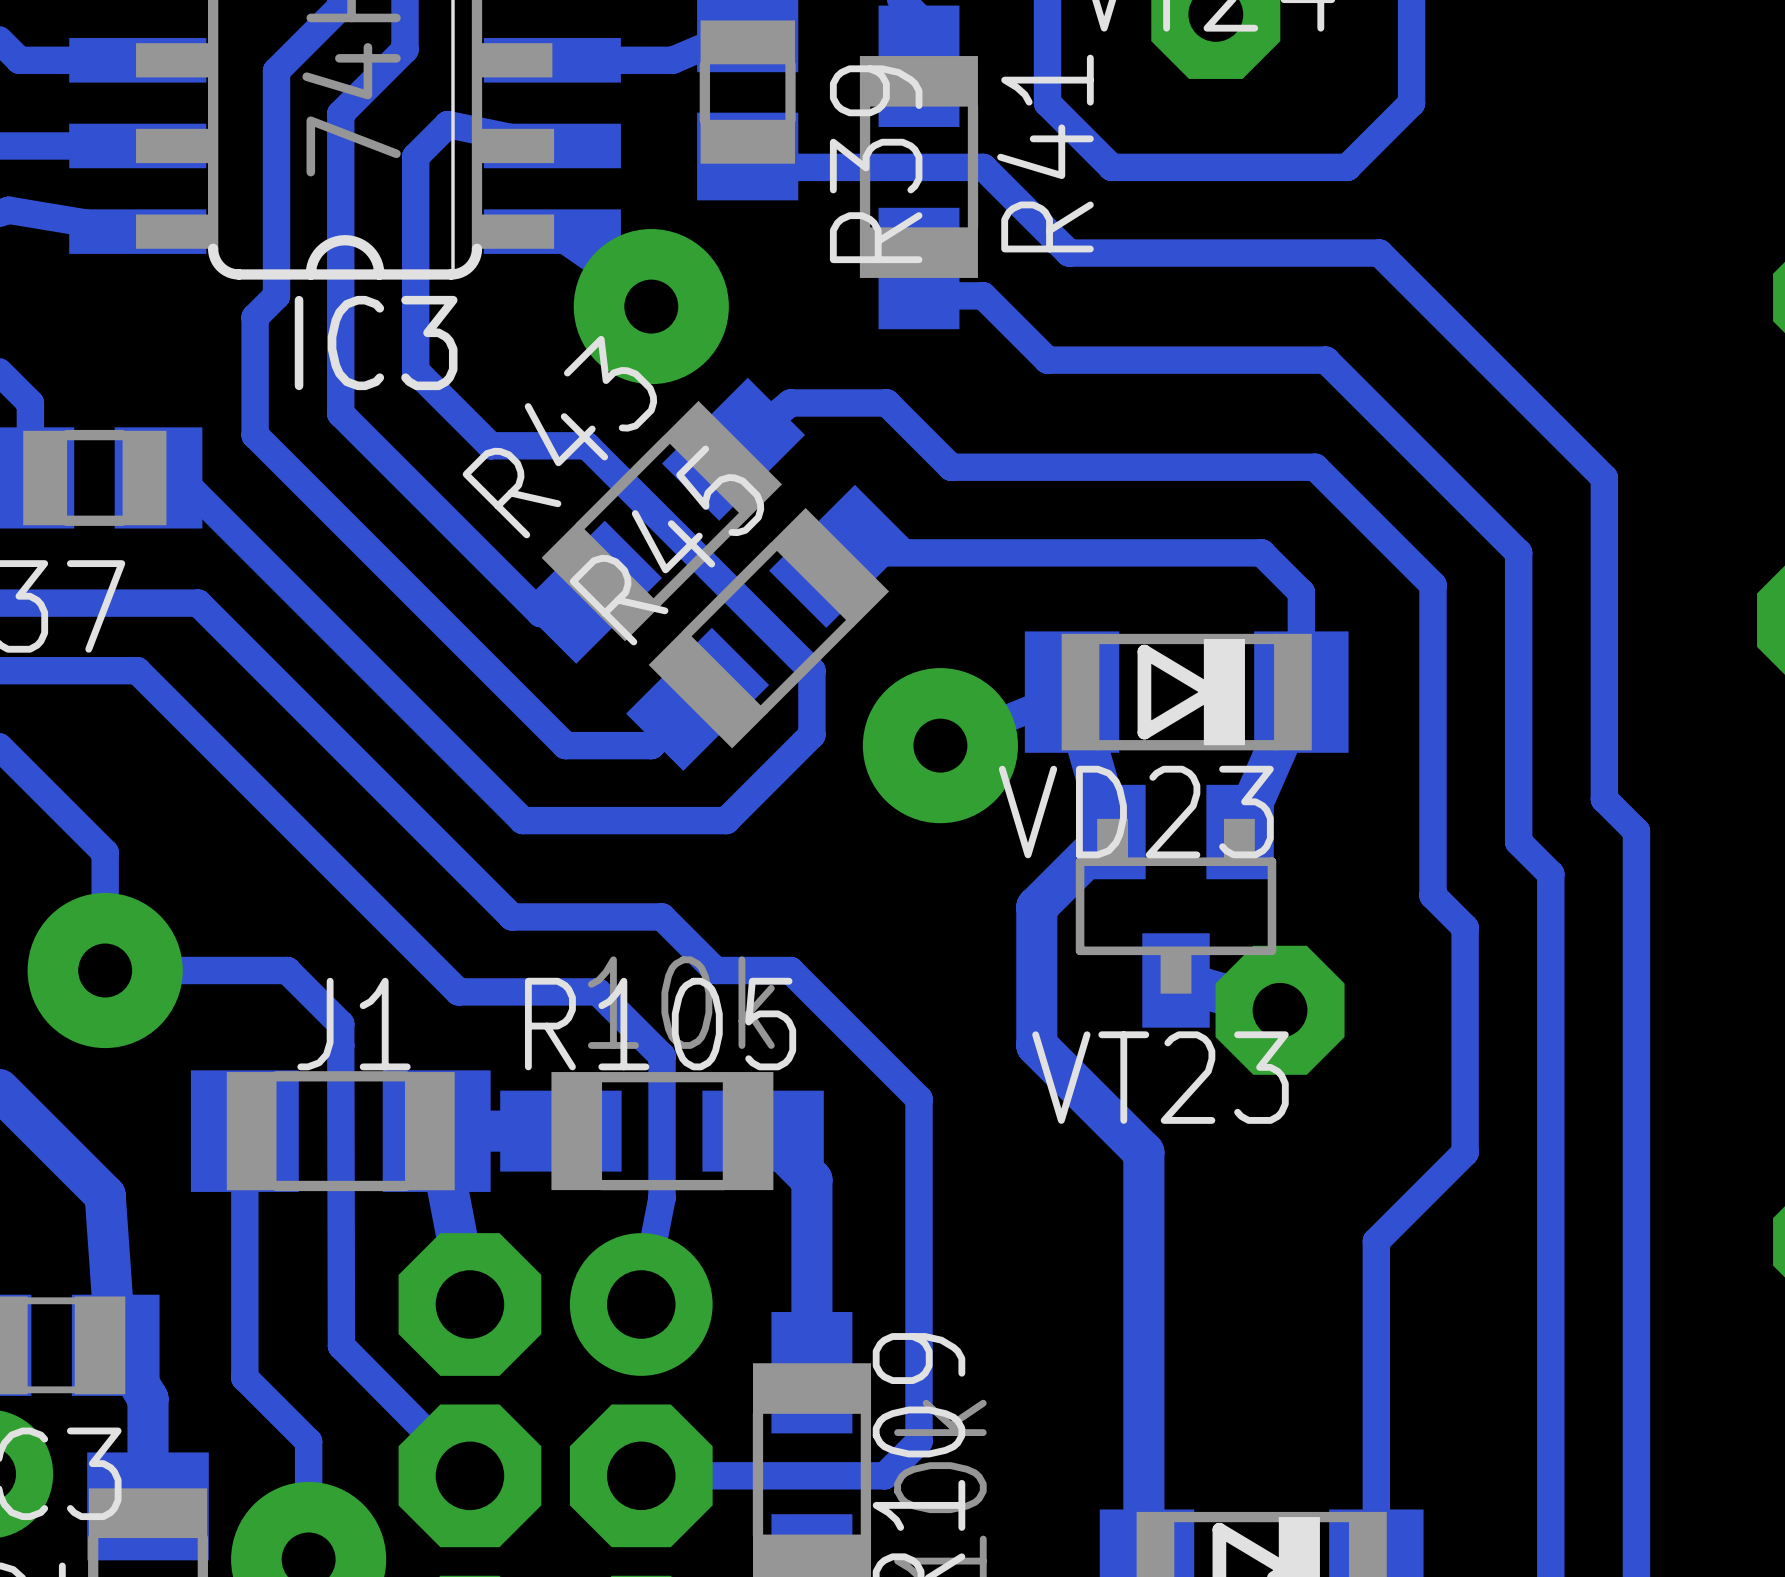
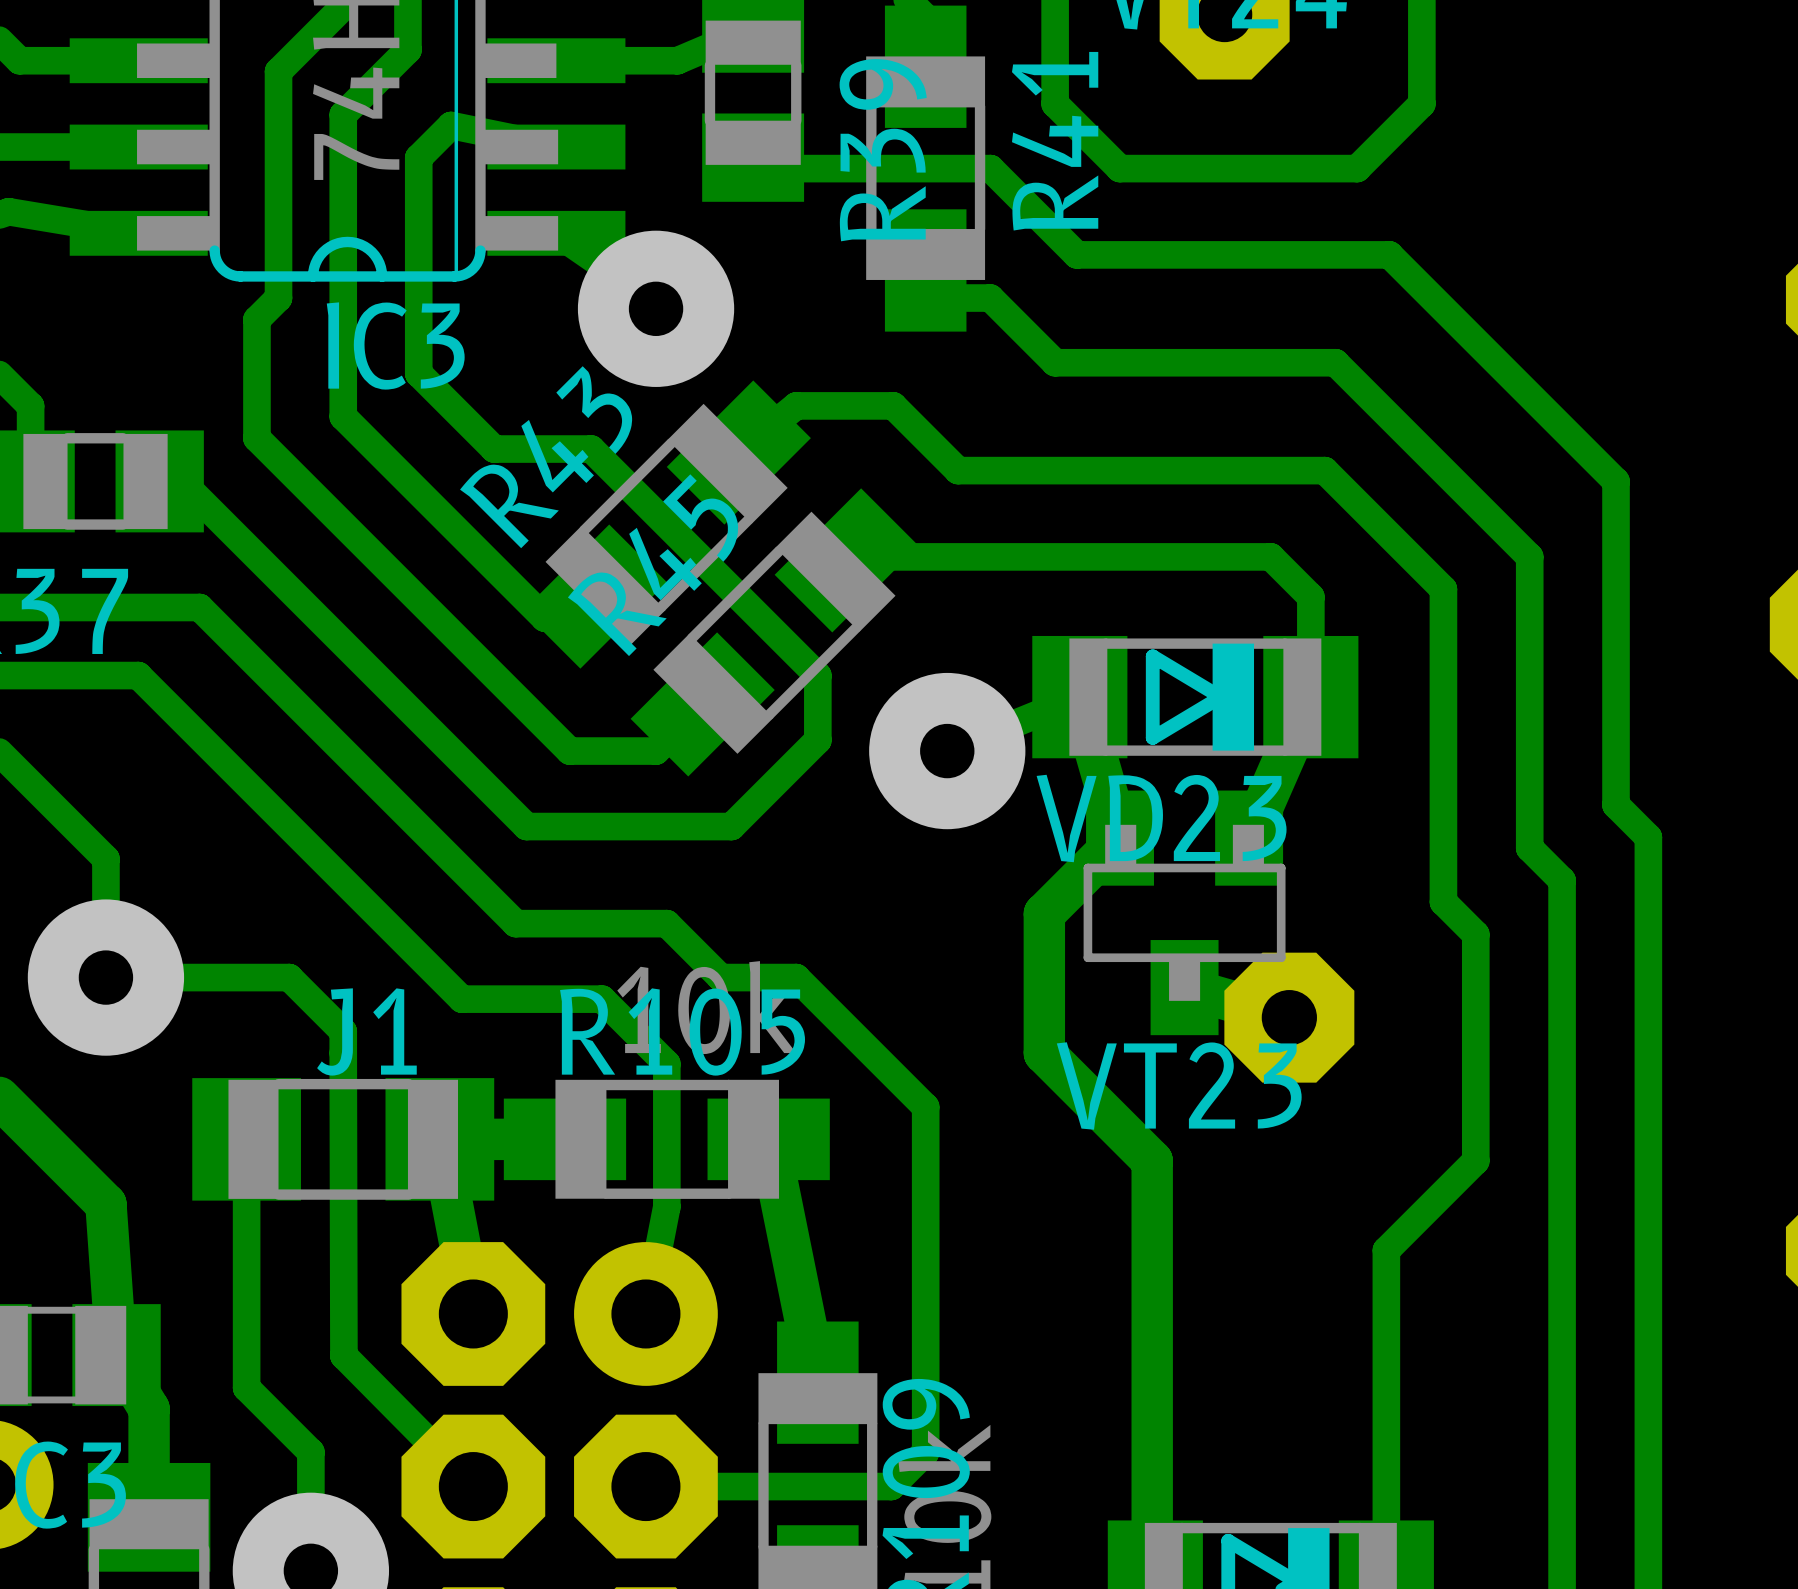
track: (763, 1131) (811, 1179) (811, 1372) -> (768, 1139) (817, 1382)

